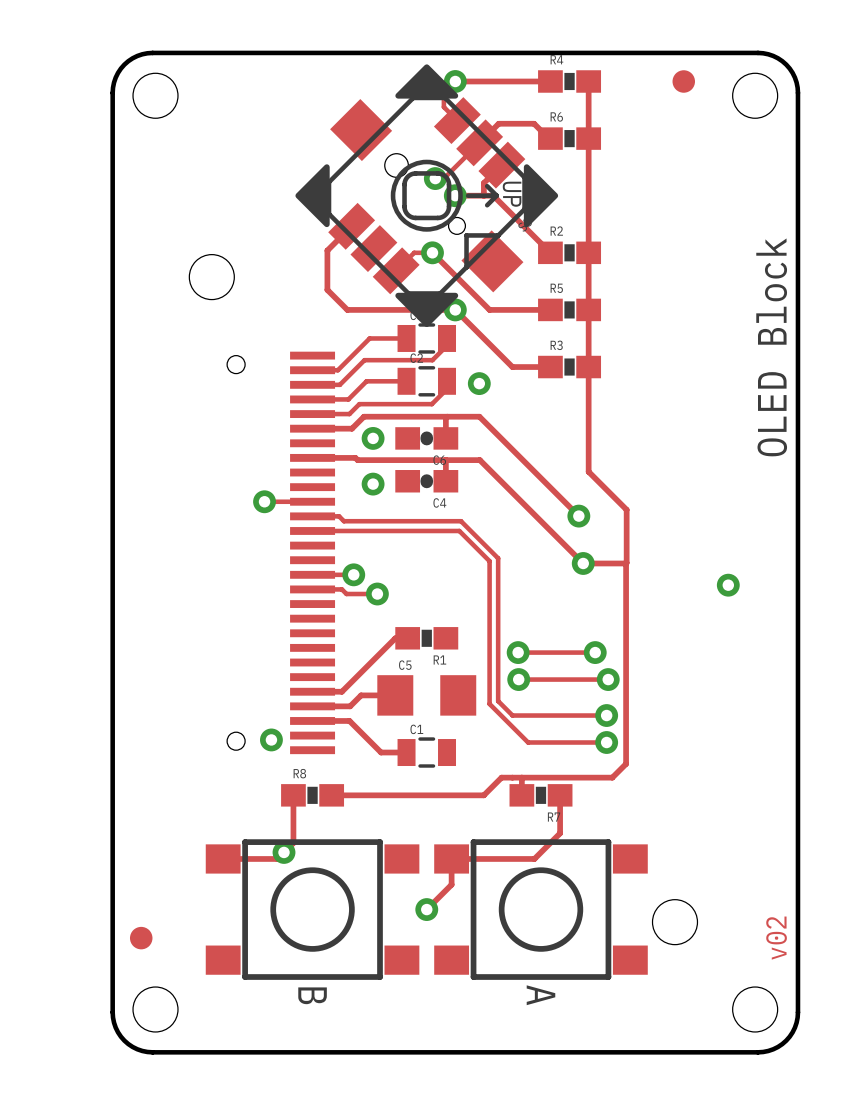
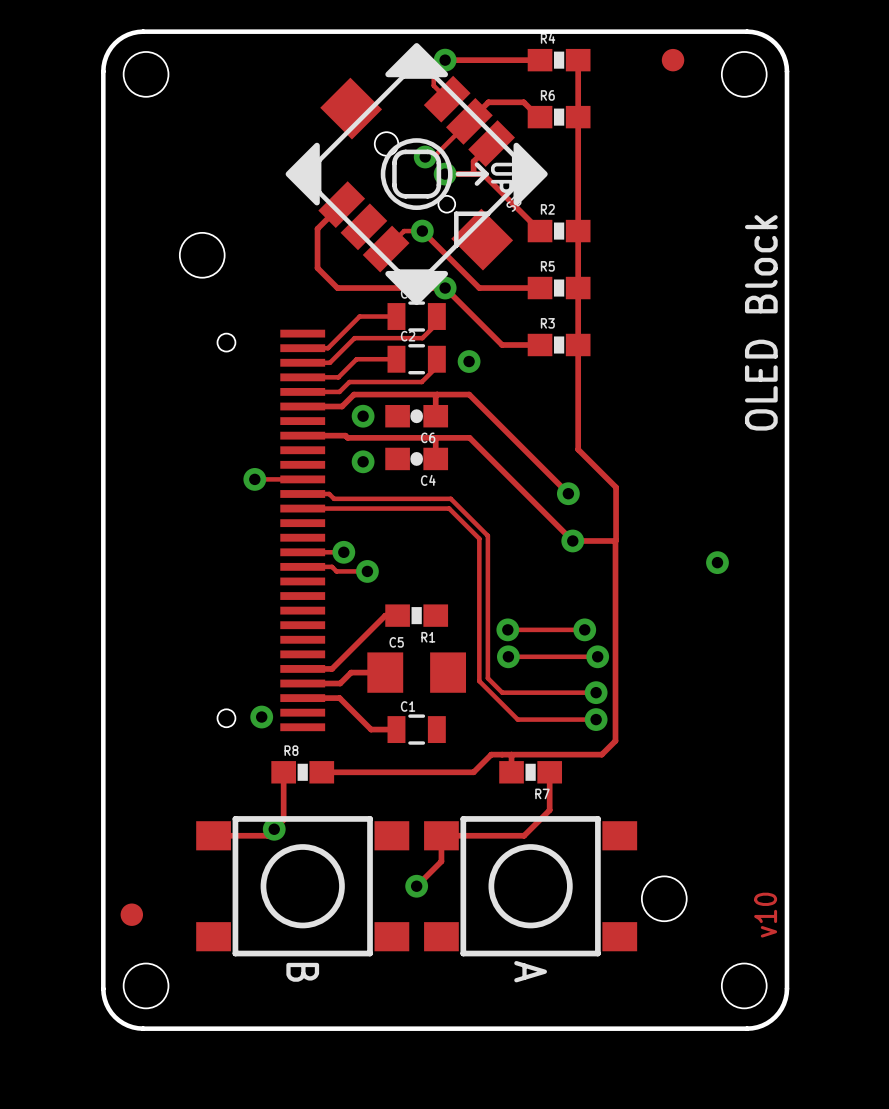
text: v02 (776, 938) -> v10 (765, 915)

